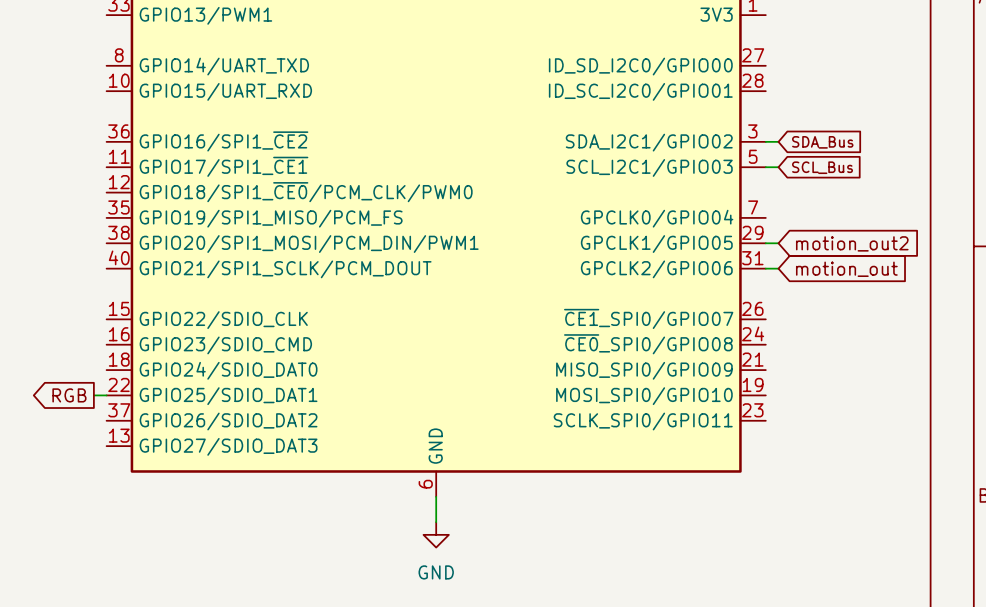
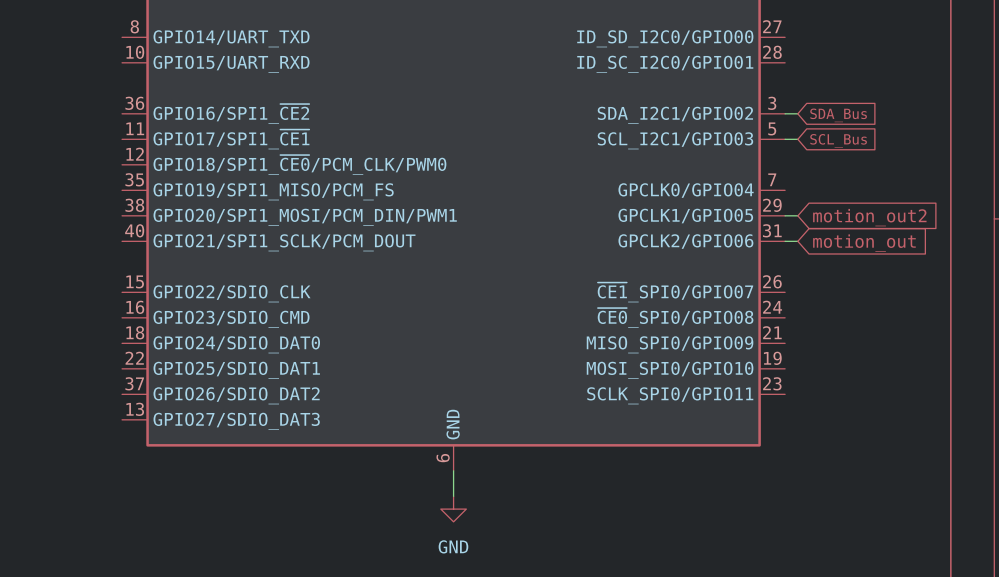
global label: RGB (69, 395) -> none
wire: (93, 395) (106, 395) -> none

